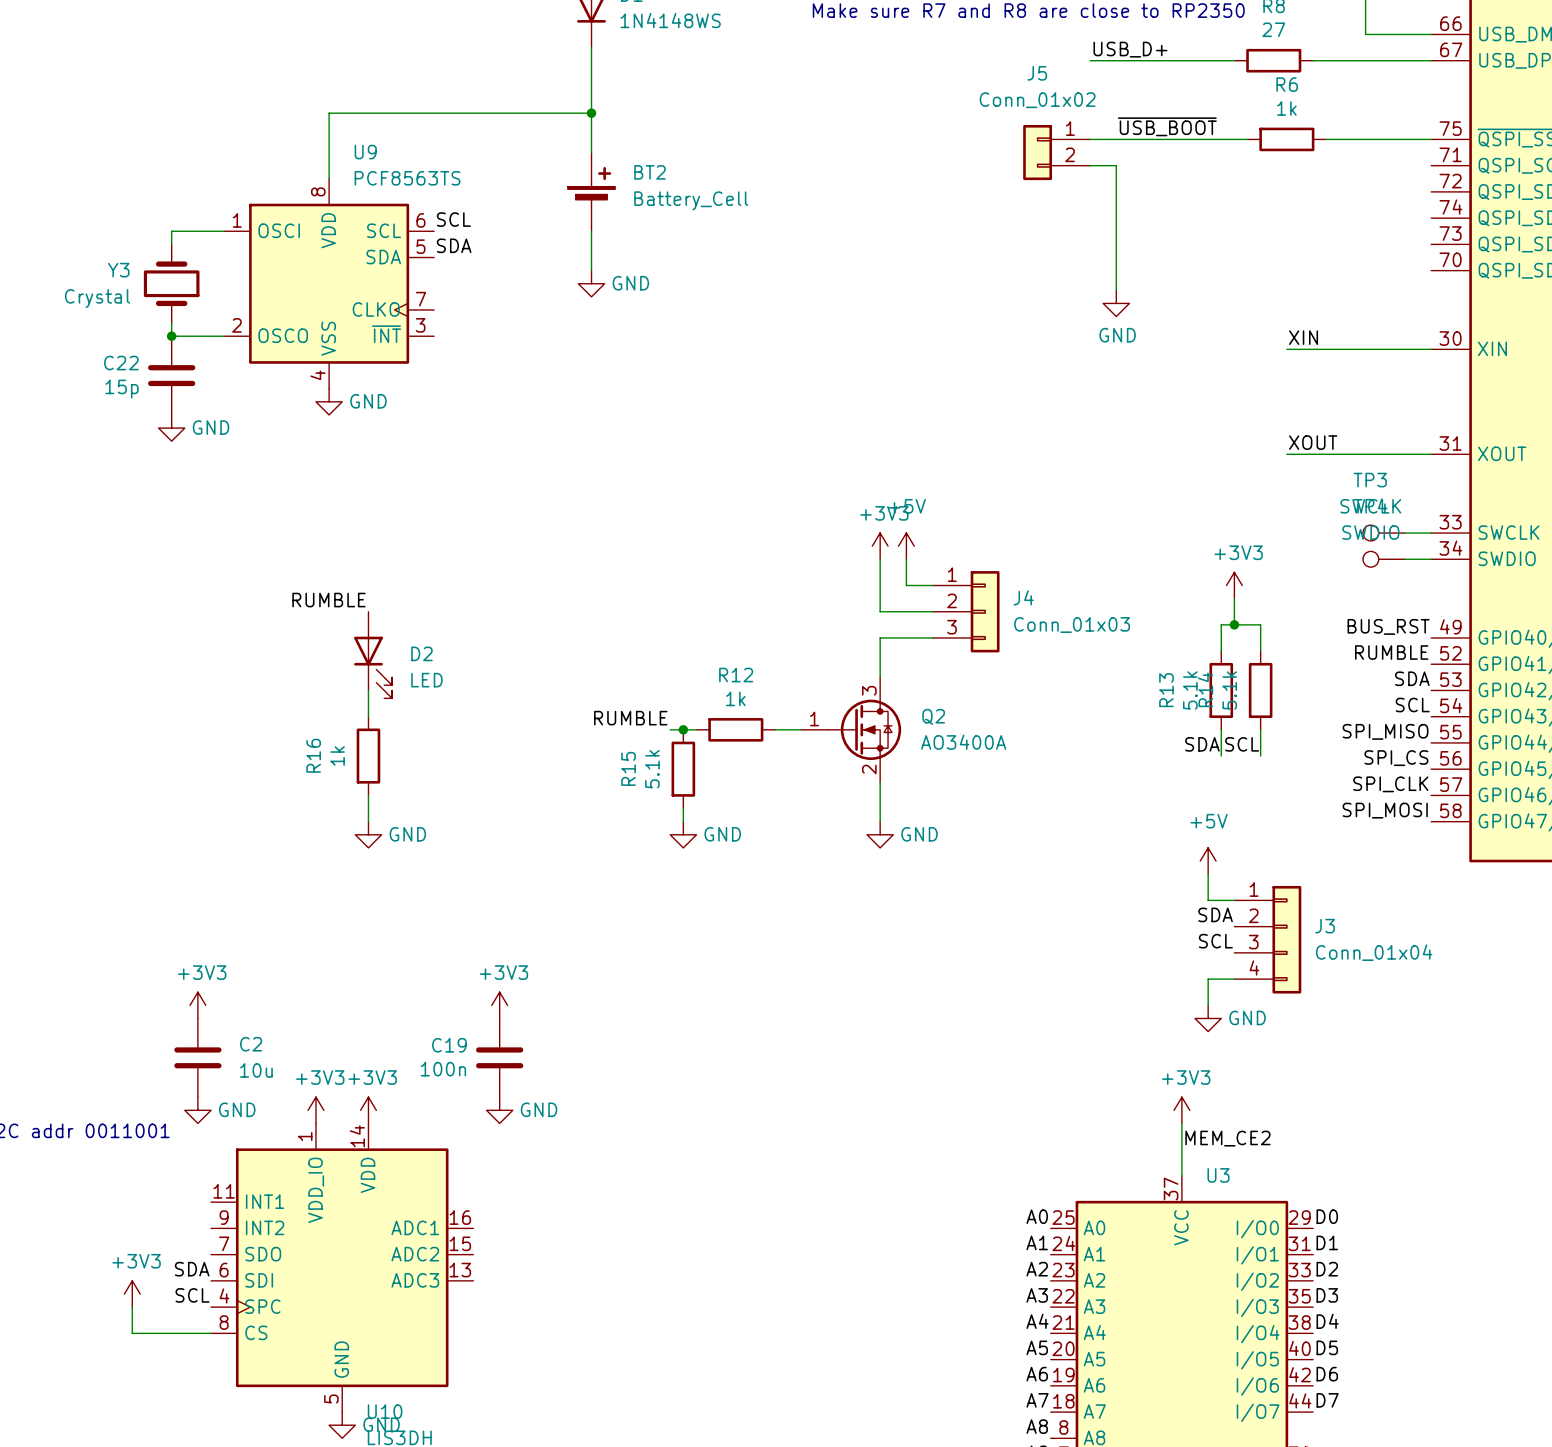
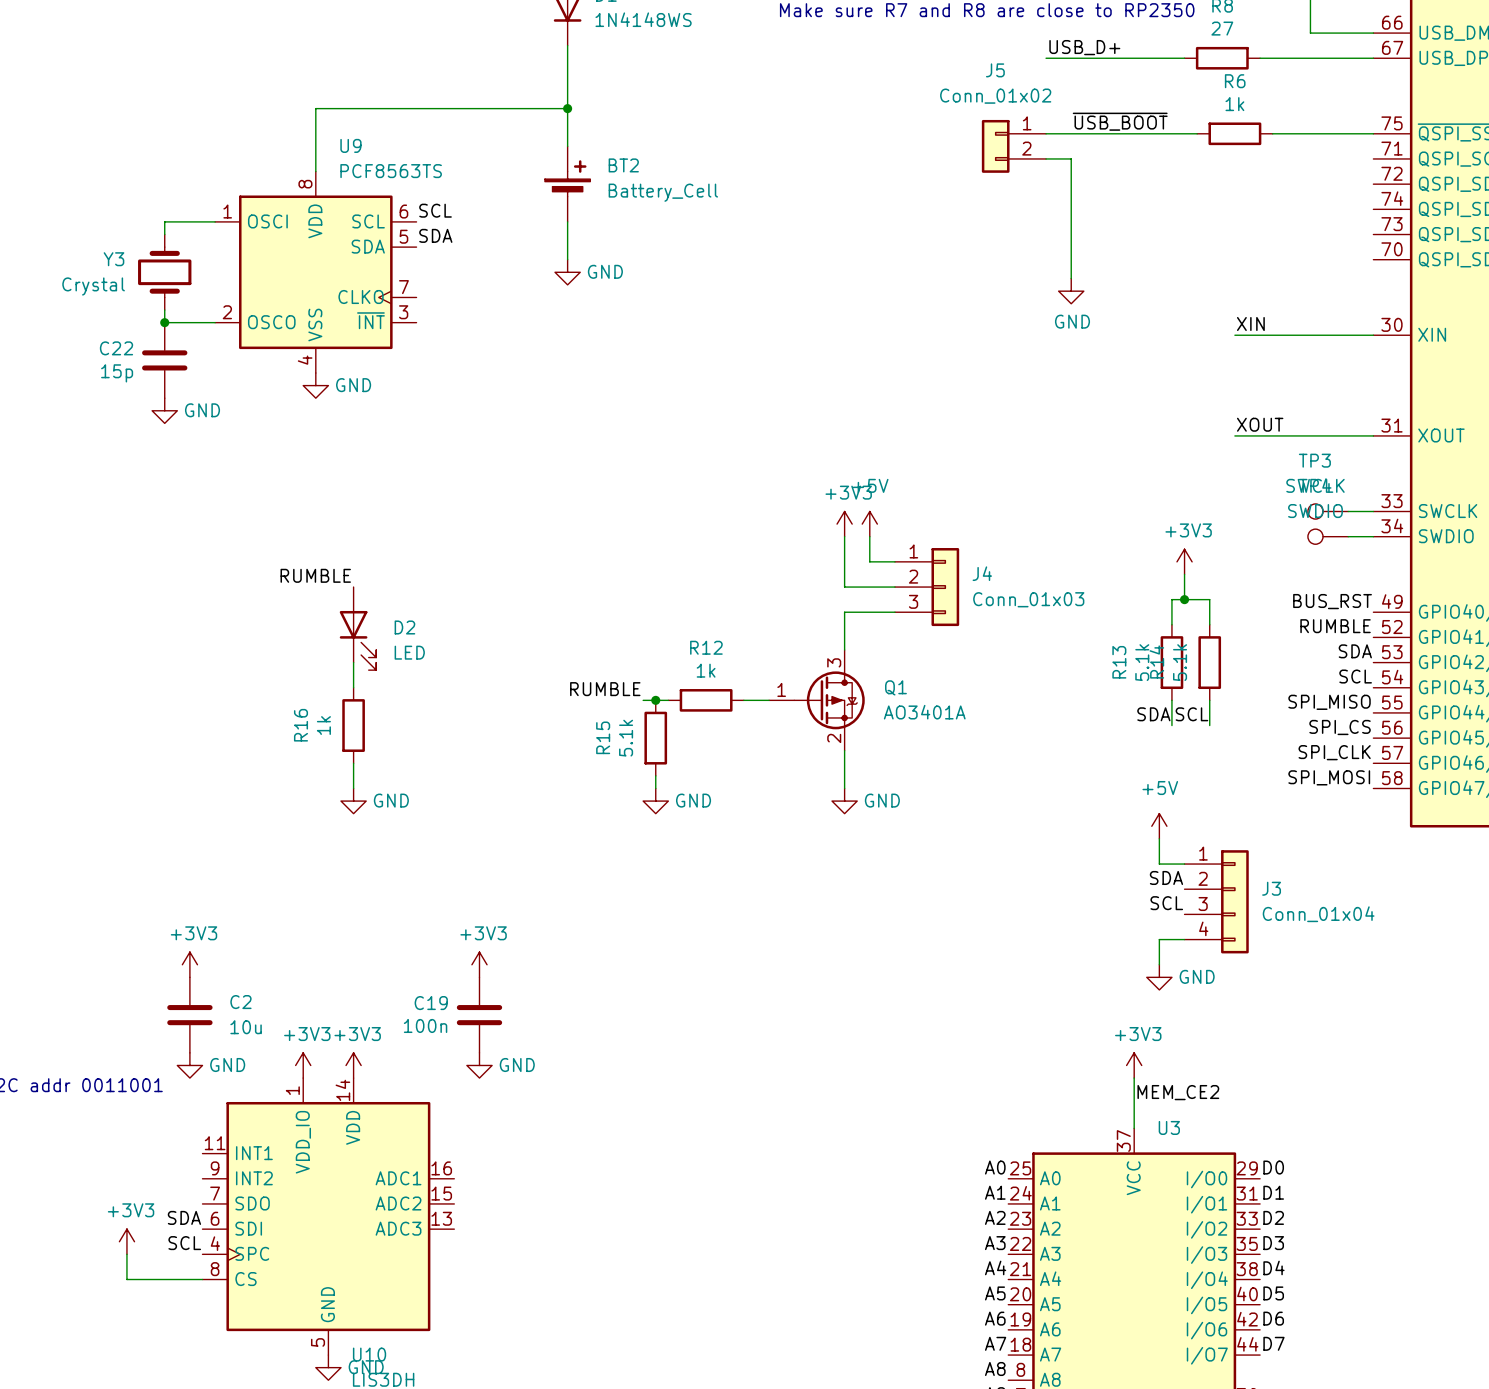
Q2: AO3400A (851, 729) -> none
Q1: none -> AO3401A (816, 700)

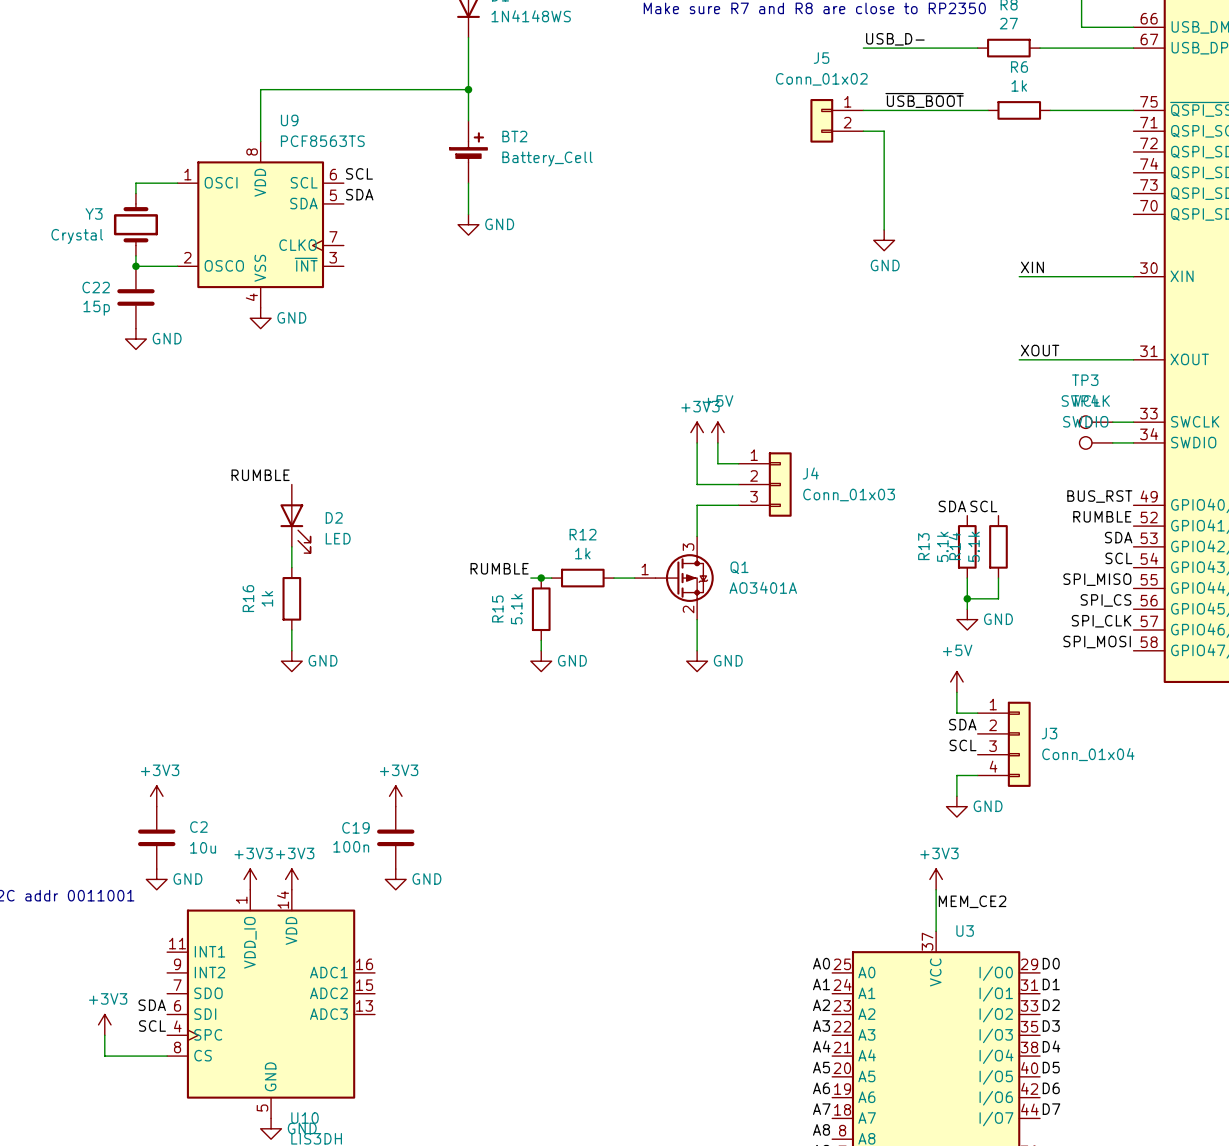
label: USB_D+ (1084, 47) -> USB_D- (895, 39)
power symbol: +3V3 (1184, 561) -> none
wire: (1184, 574) (1184, 599) -> none
junction: (1184, 599) -> none
wire: (1171, 624) (1171, 599) (1209, 599) (1209, 624) -> none
label position: SDA (1153, 714) -> SDA (952, 506)
label position: SCL (1191, 714) -> SCL (983, 506)
junction: none -> (967, 598)
wire: none -> (998, 598) (967, 598) (967, 609)
power symbol: none -> GND (967, 619)

